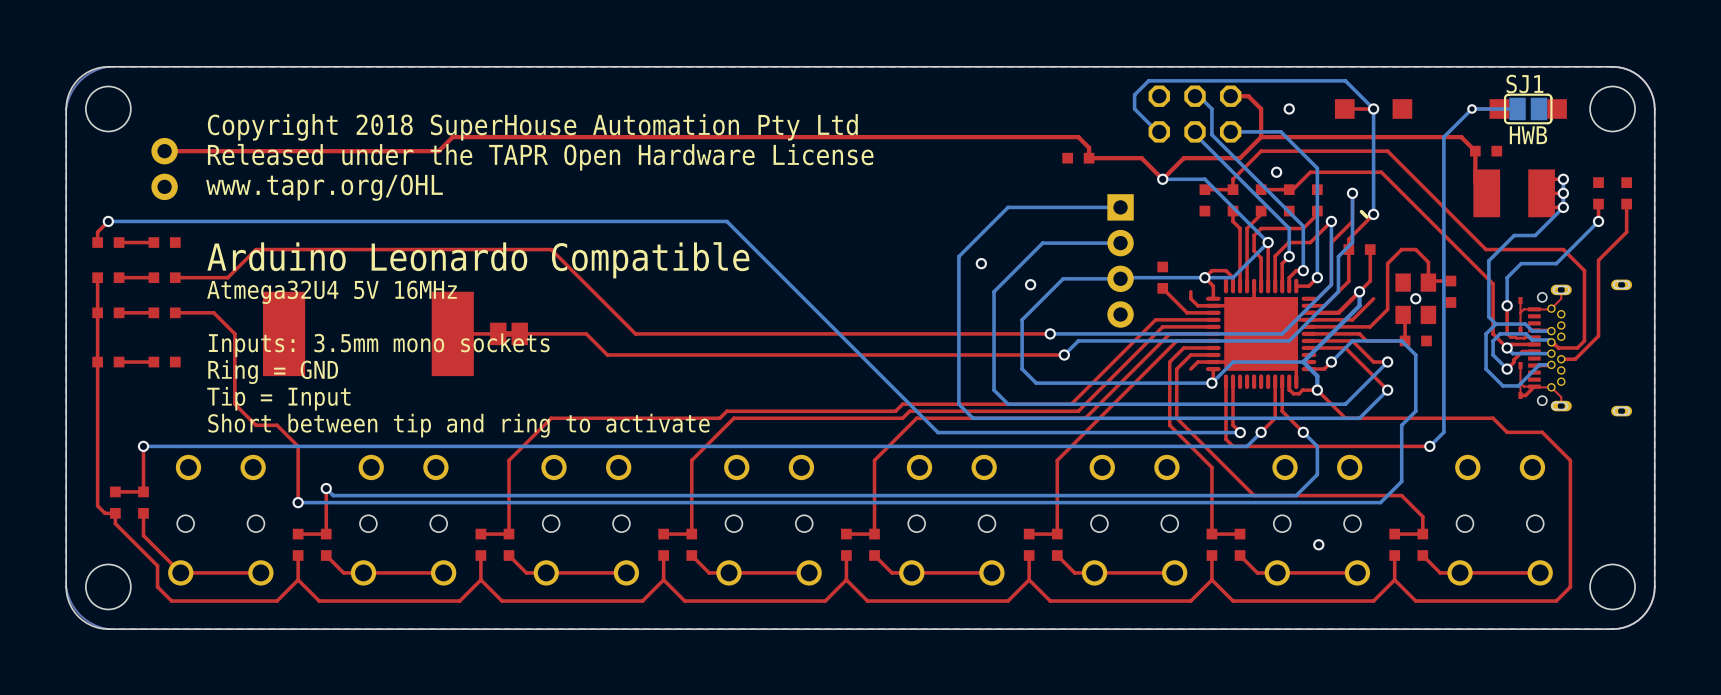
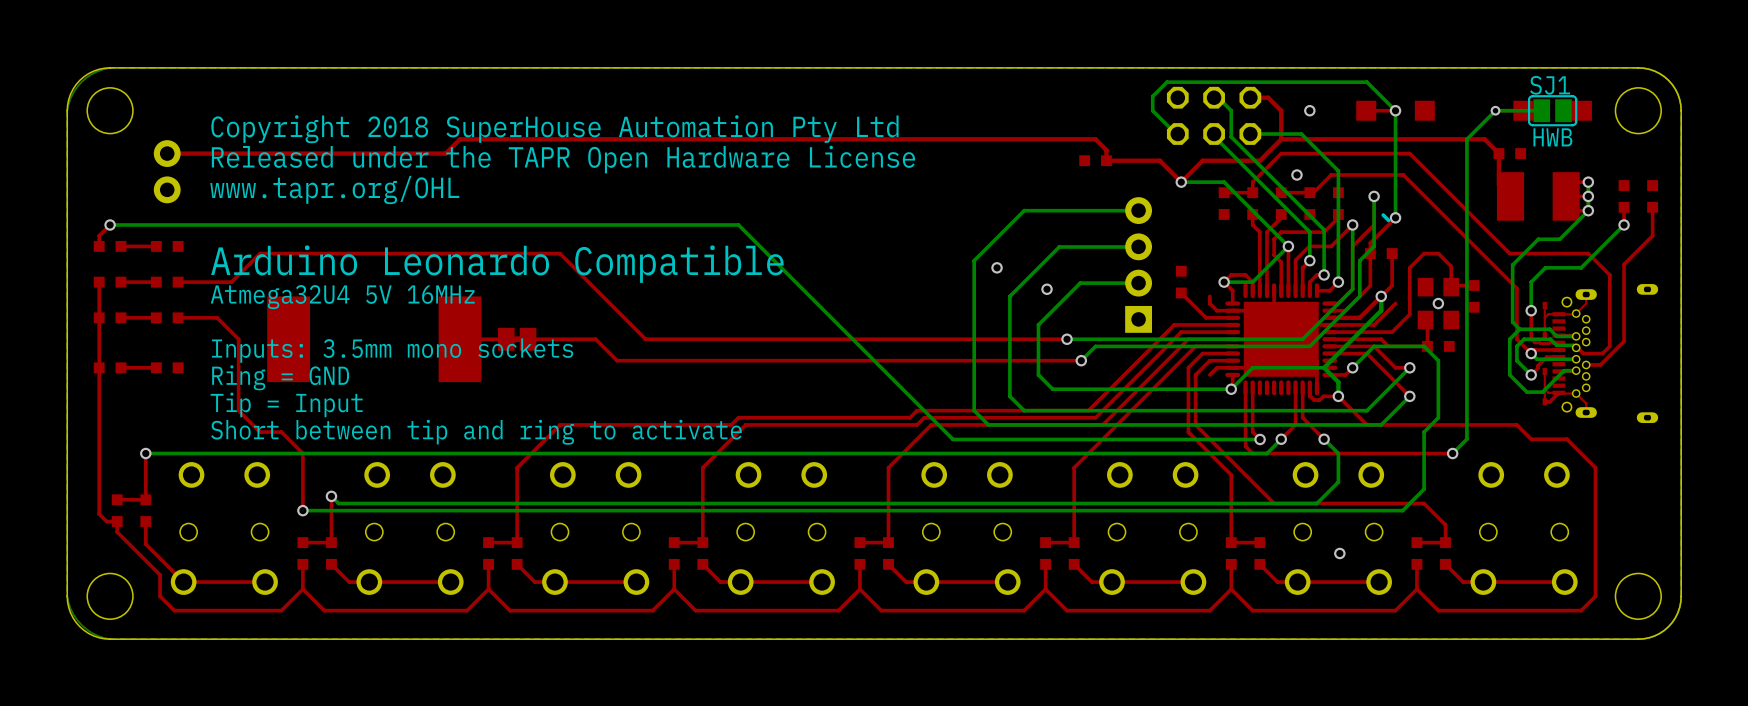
part rotation: 0° (1120, 260) -> 180° (1138, 264)
bottom track: (1204, 277) (1063, 278) -> (1138, 283) (1080, 283)

